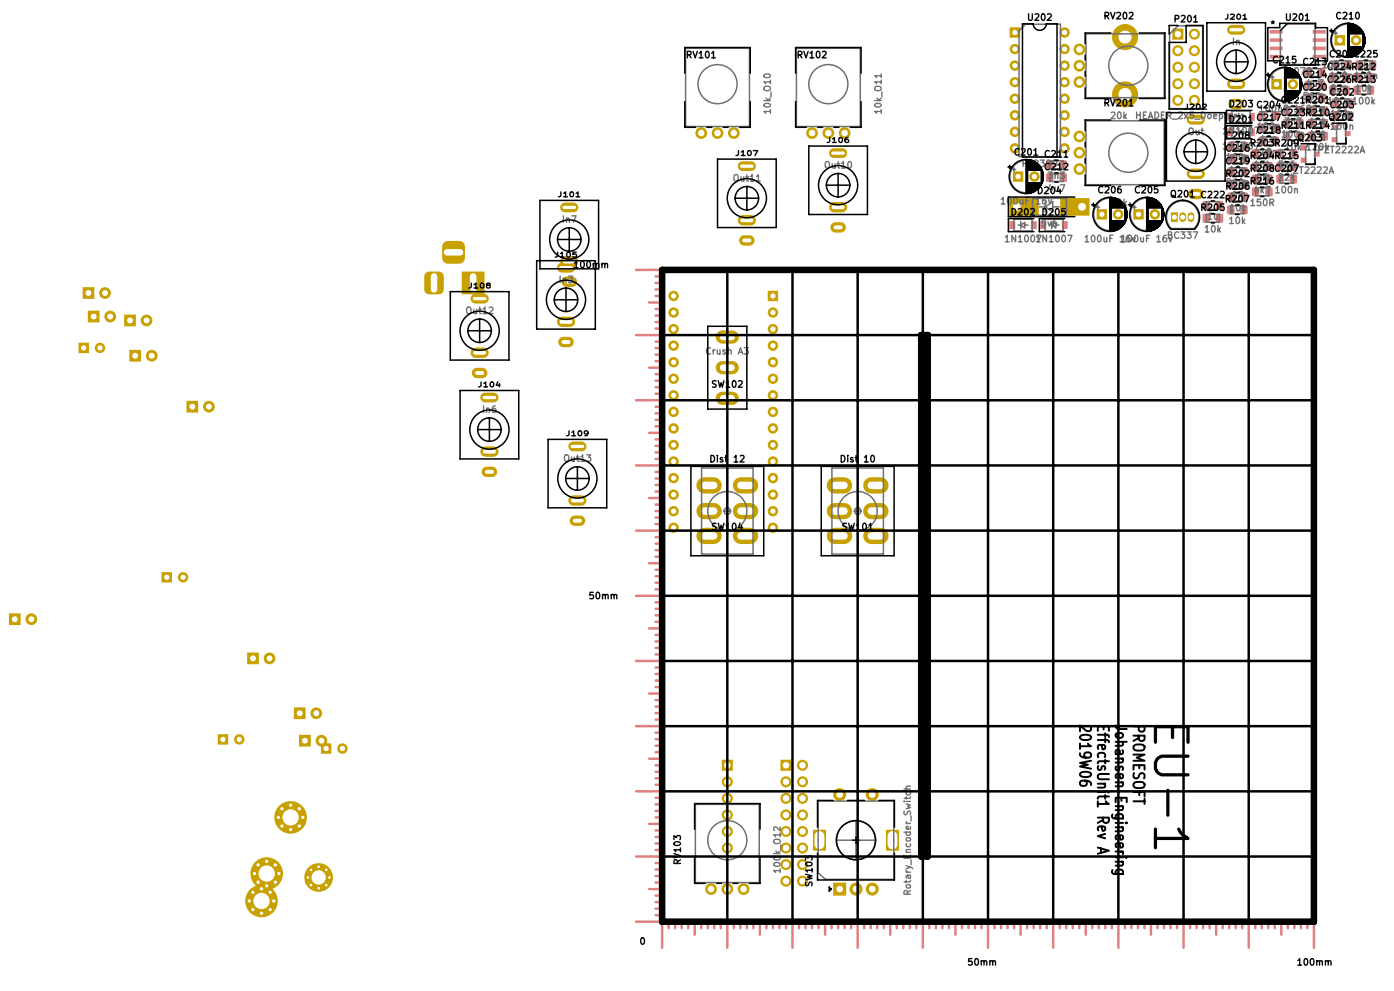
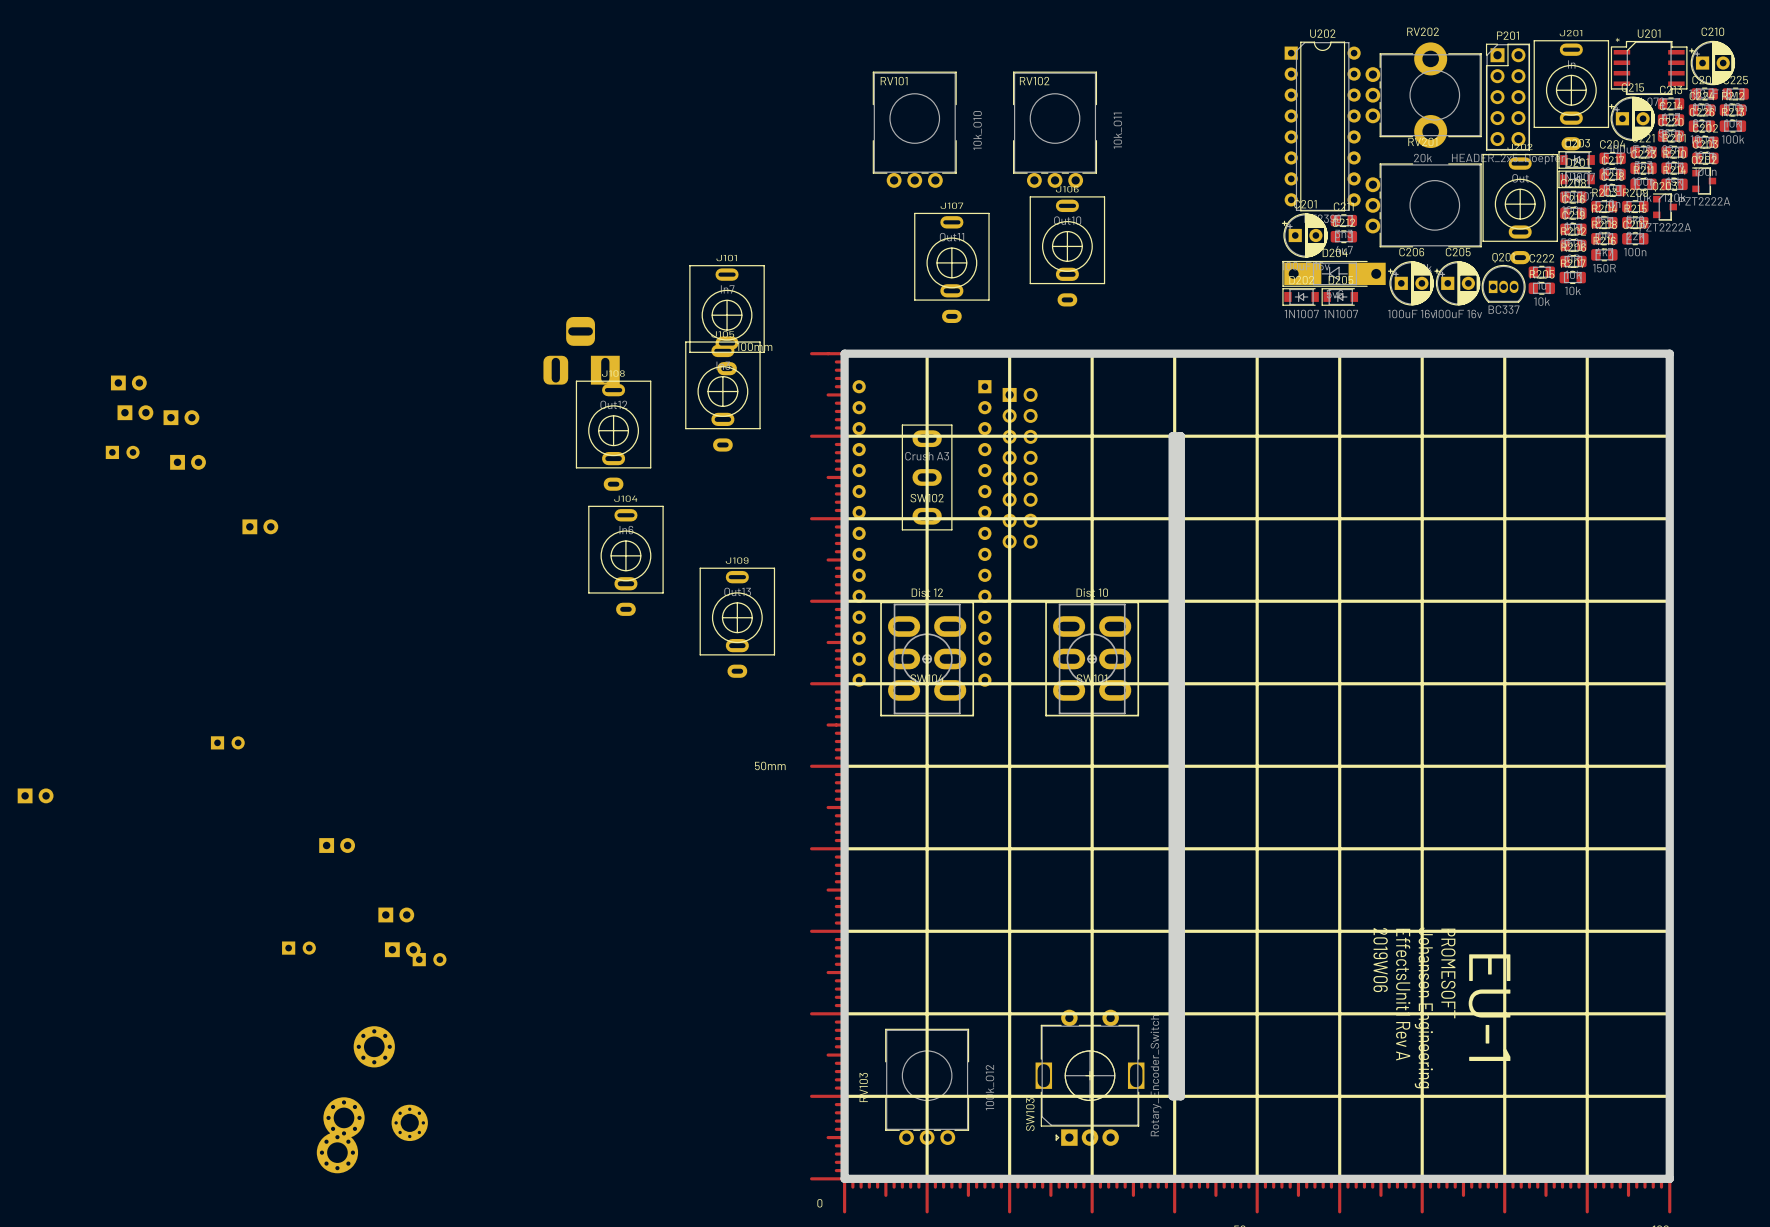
part: none -> (1020, 468)
part: (727, 806) -> none
part: (794, 823) -> none

